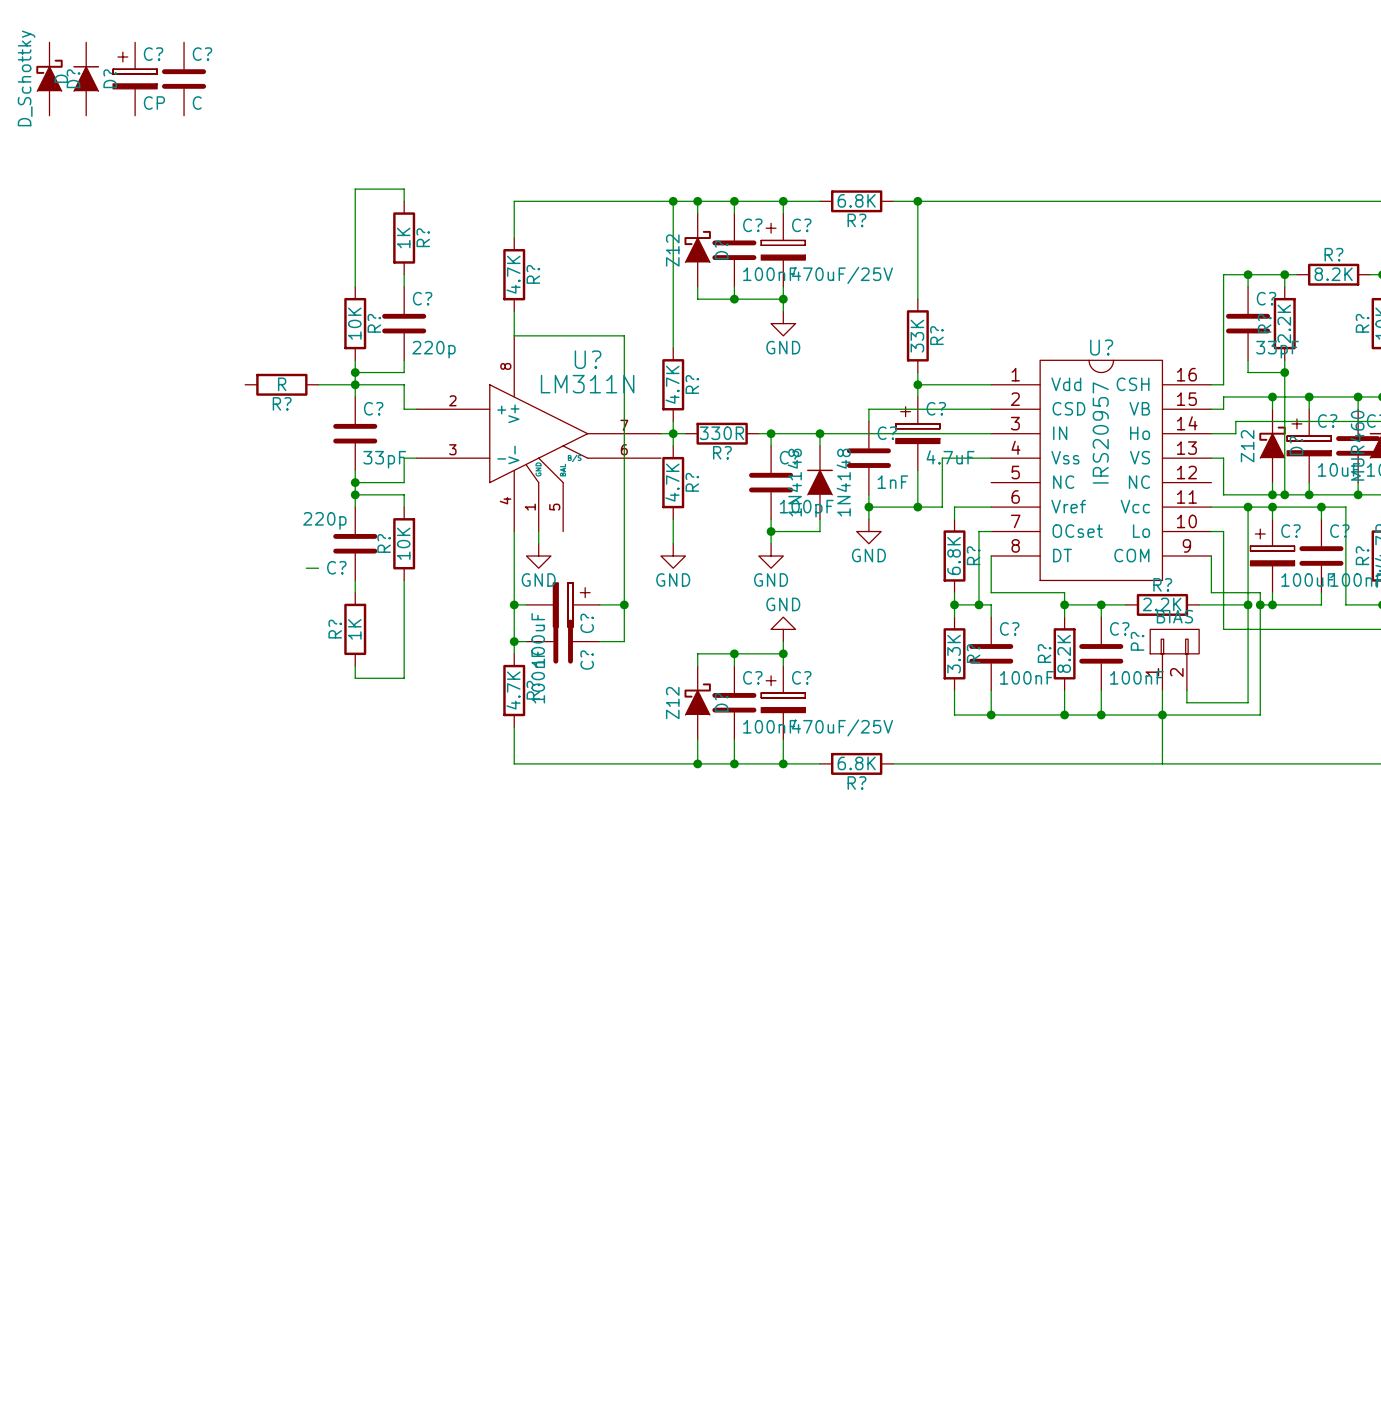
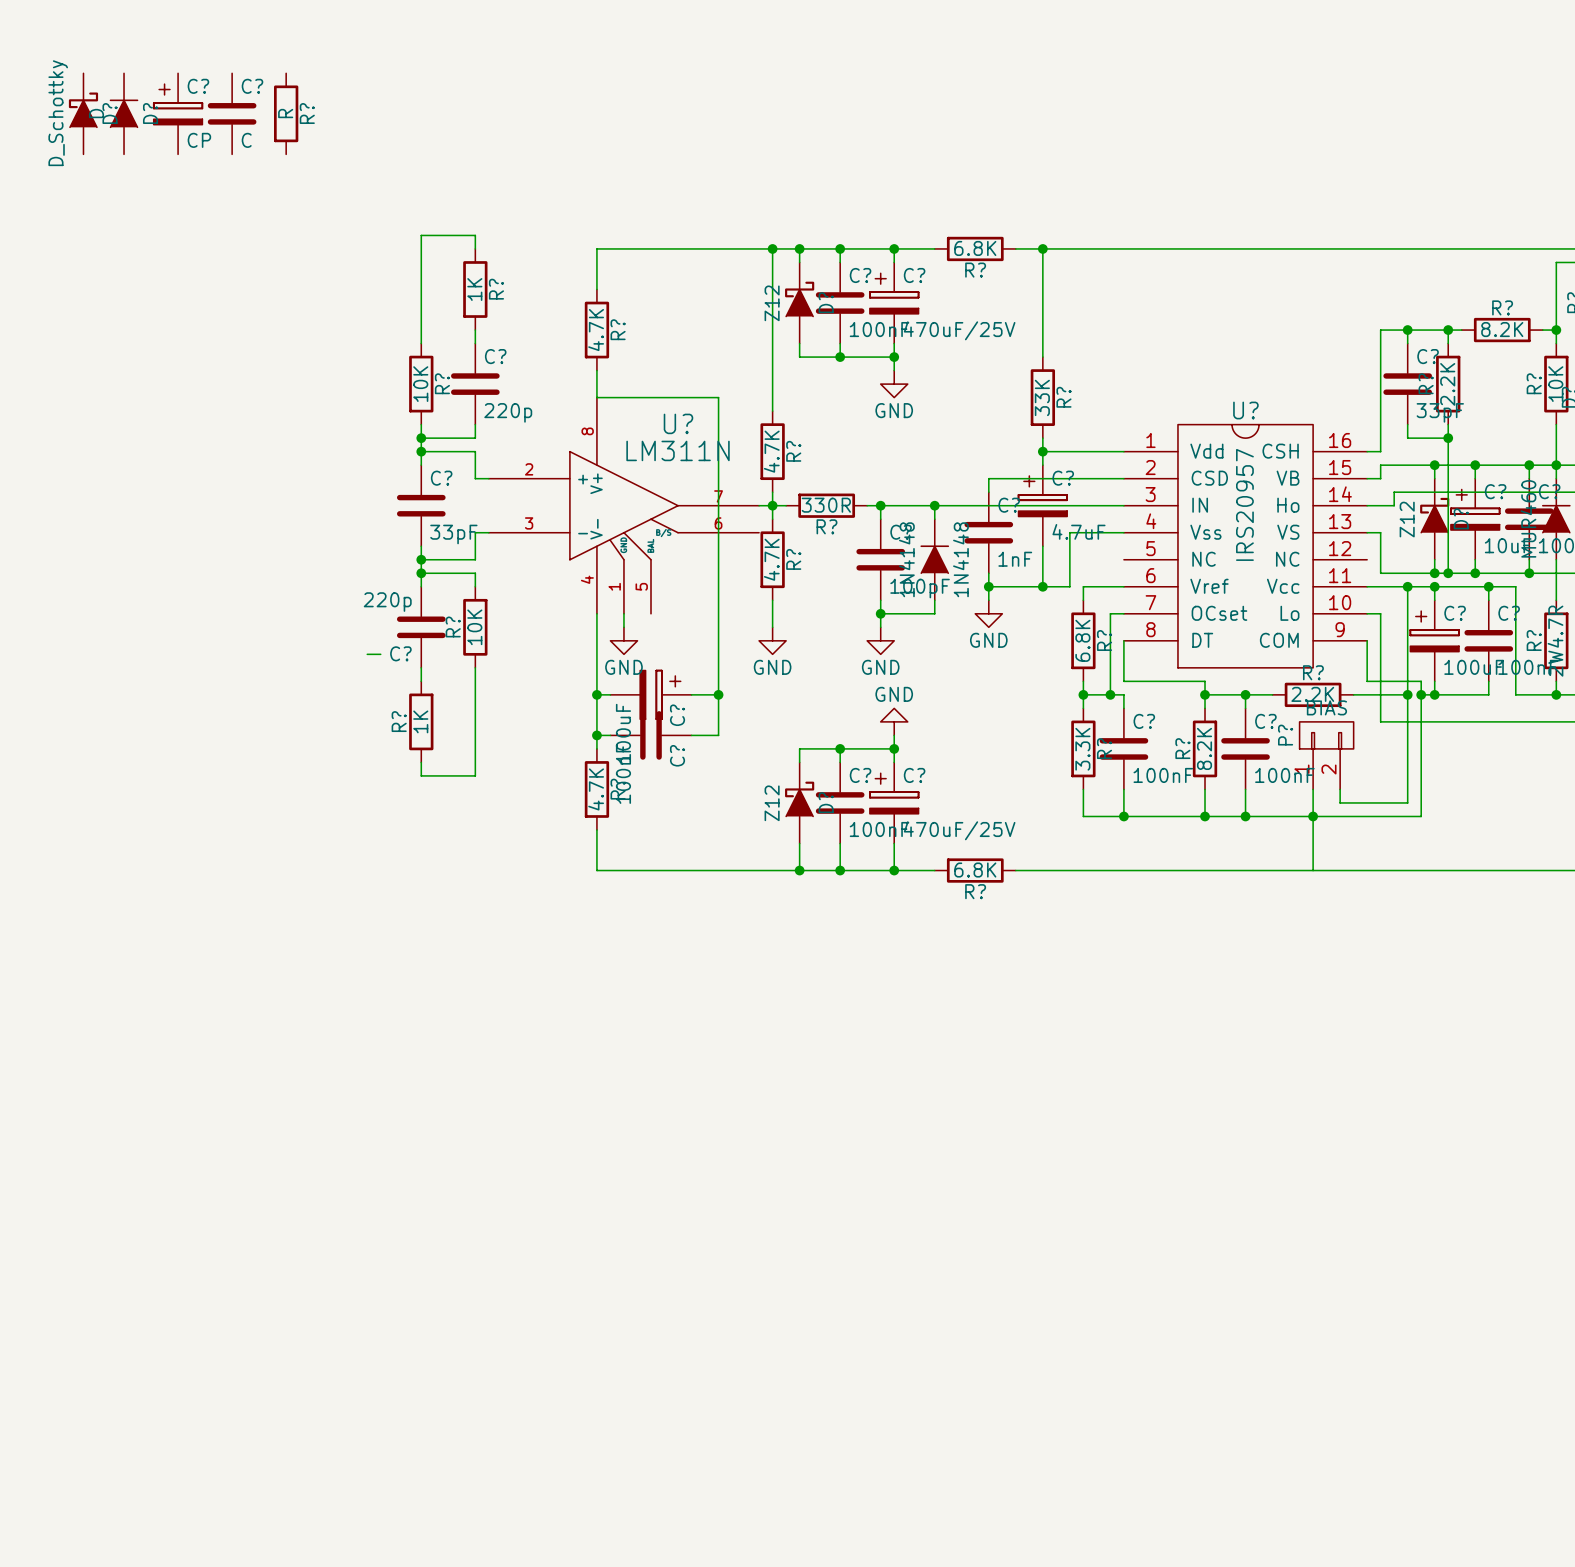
R?: none -> R (286, 113)
R?: R (281, 384) -> none
wire: (318, 384) (355, 384) -> none

